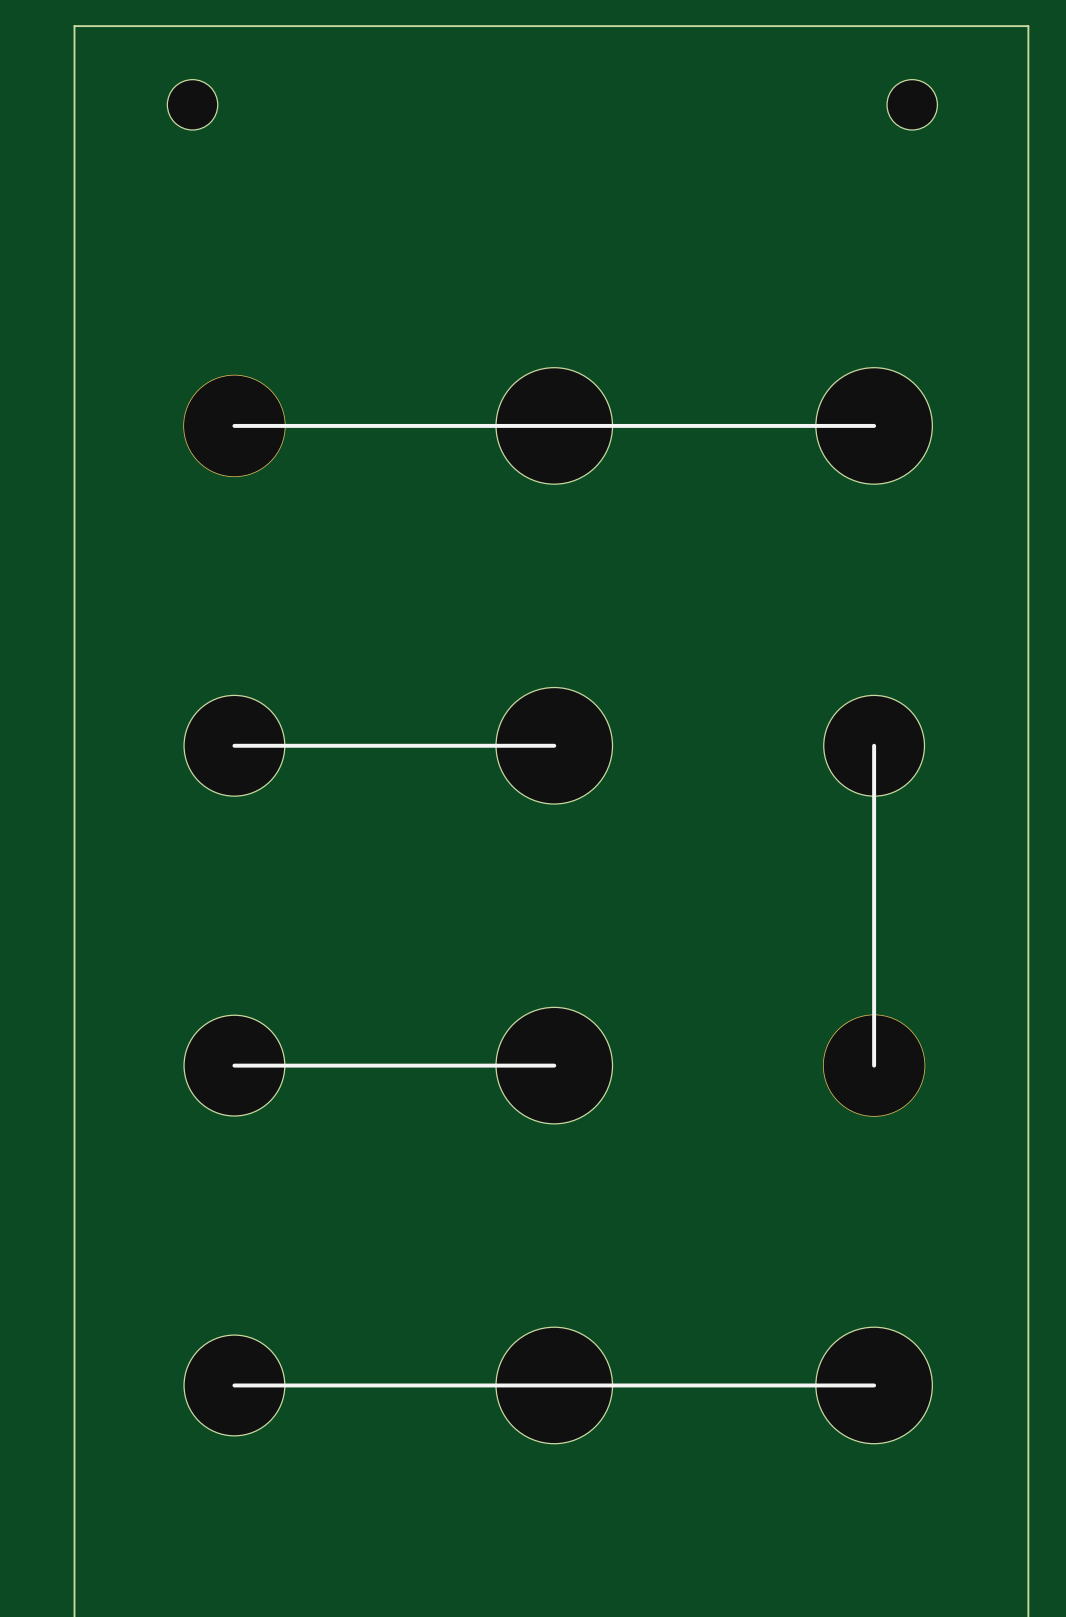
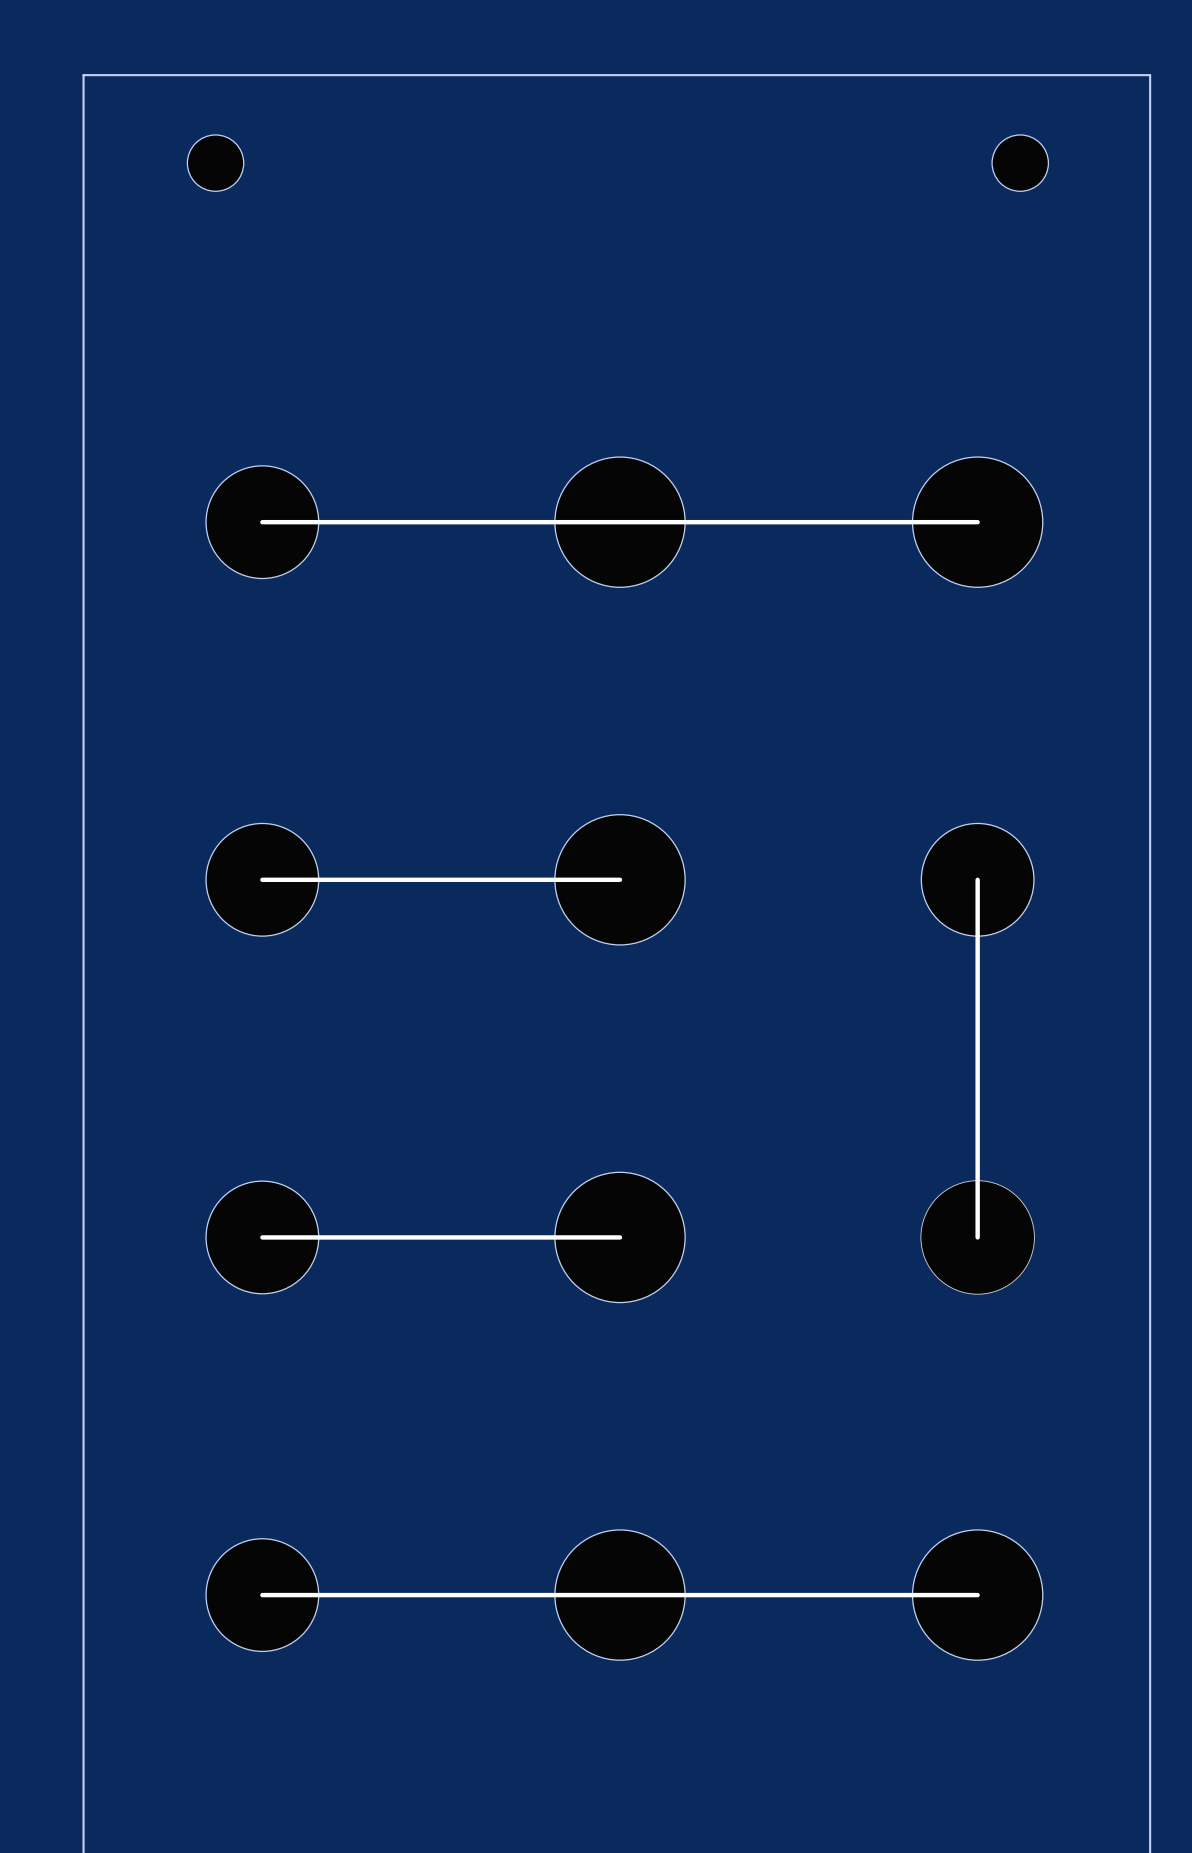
part footprint: [183, 374, 286, 478] -> [206, 465, 319, 579]

